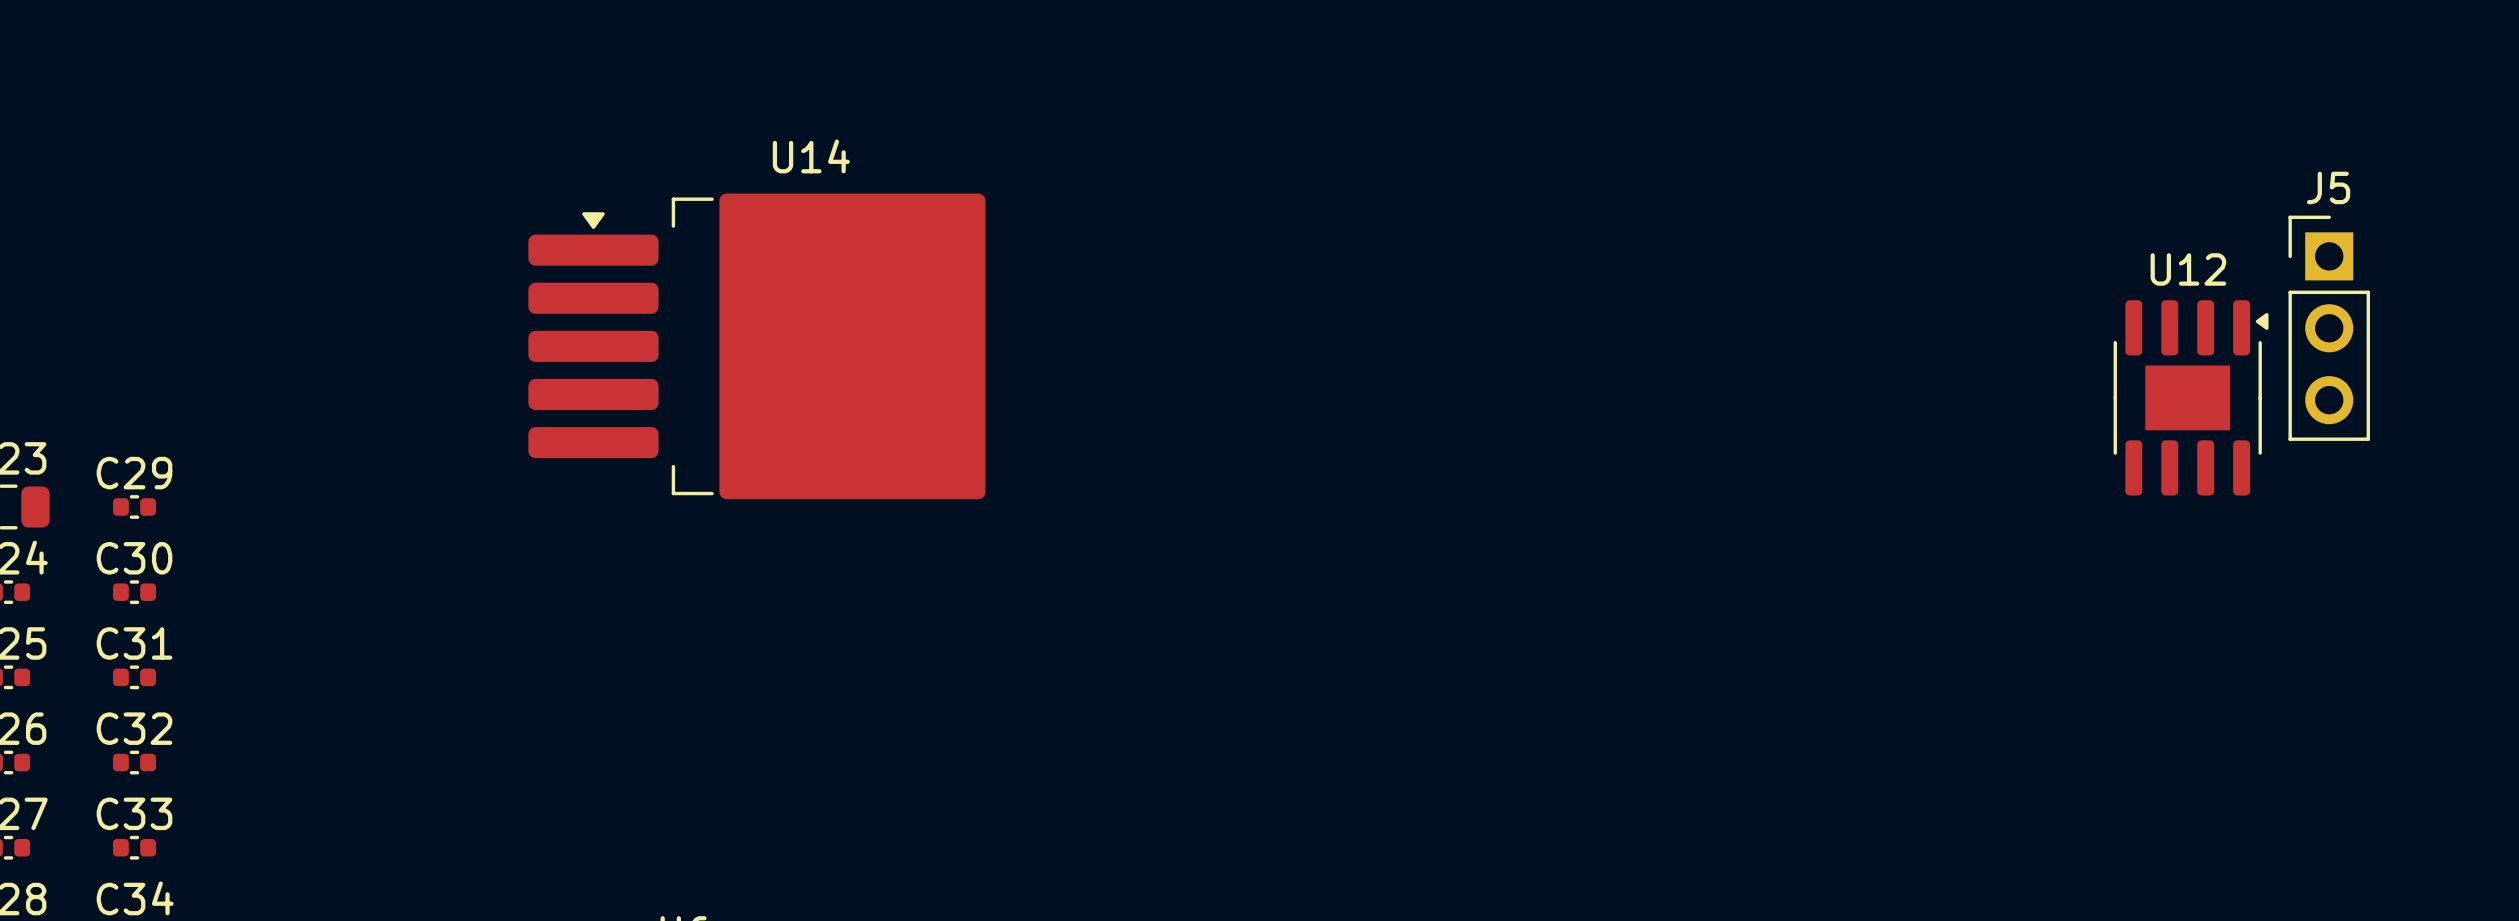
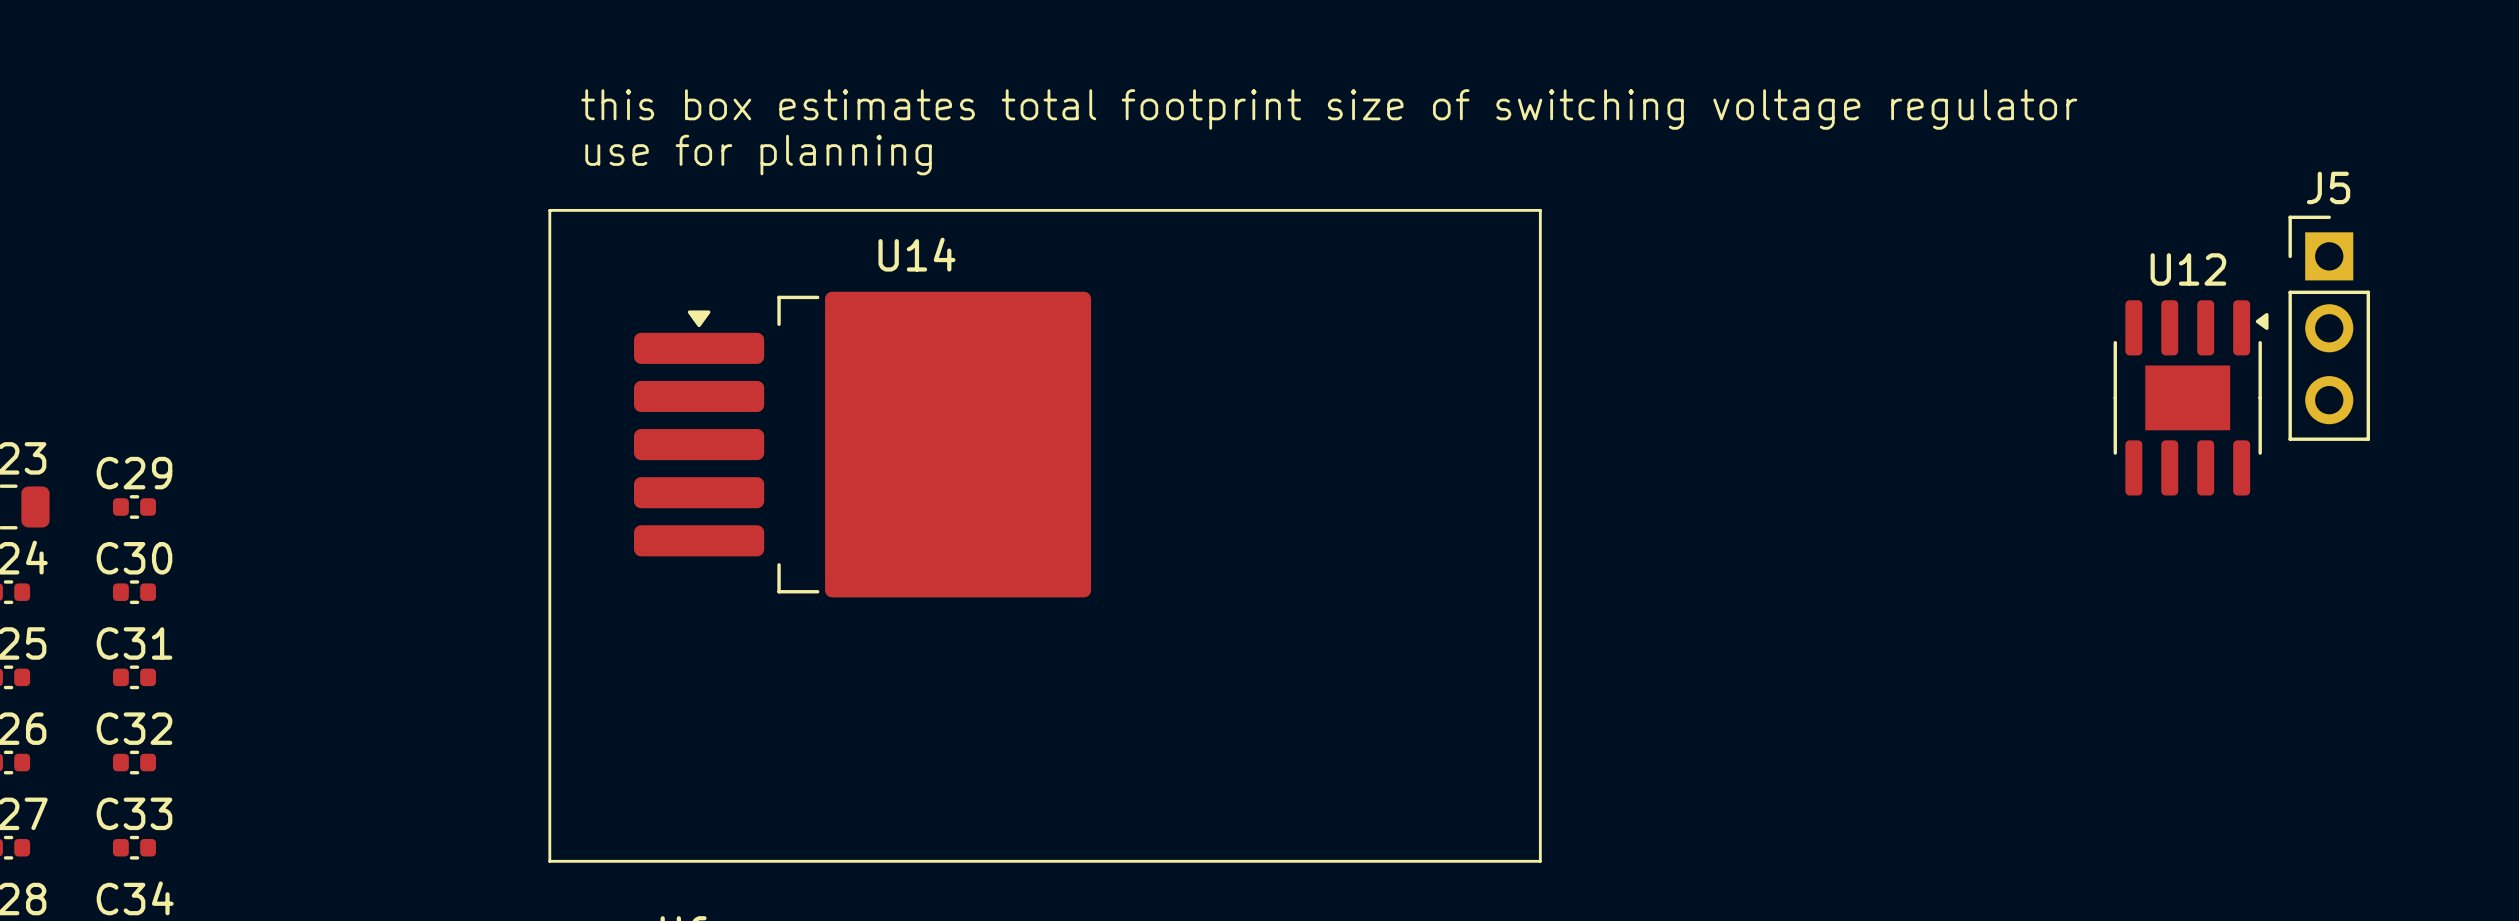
text: none -> this box estimates total footprint size of switching voltage regulator (1329, 109)
text: none -> use for planning (758, 155)
line: none -> (549, 210) (1540, 210) (1540, 861) (549, 861) (549, 210)
U14 position: (756, 346) -> (862, 444)

